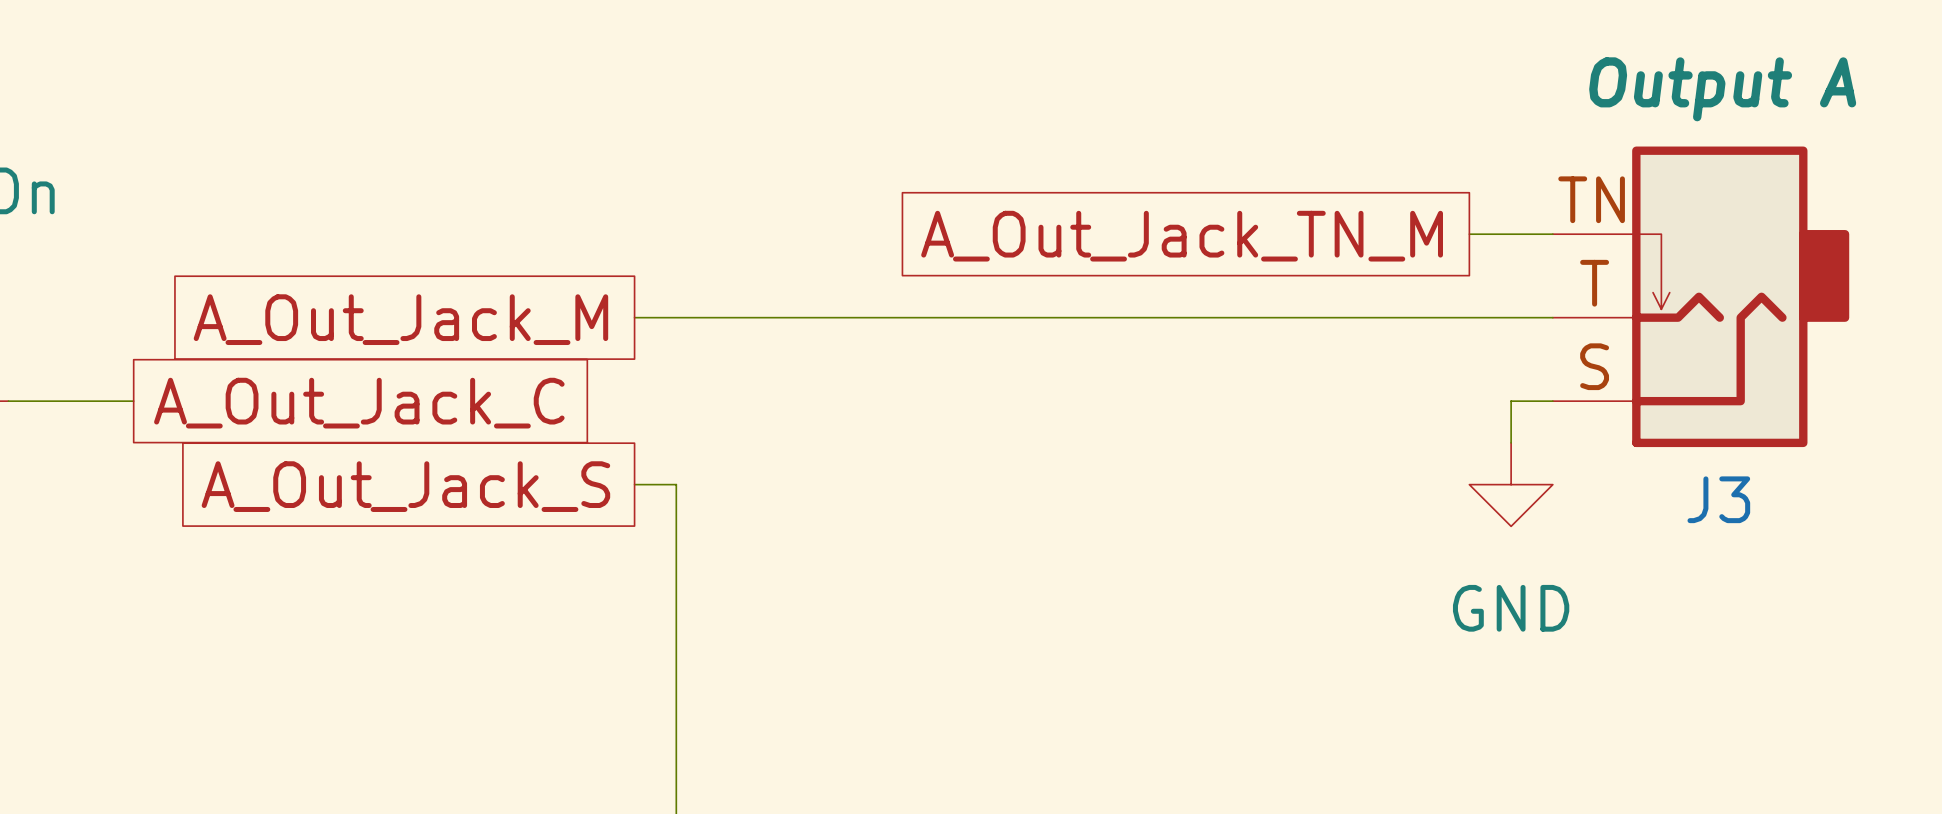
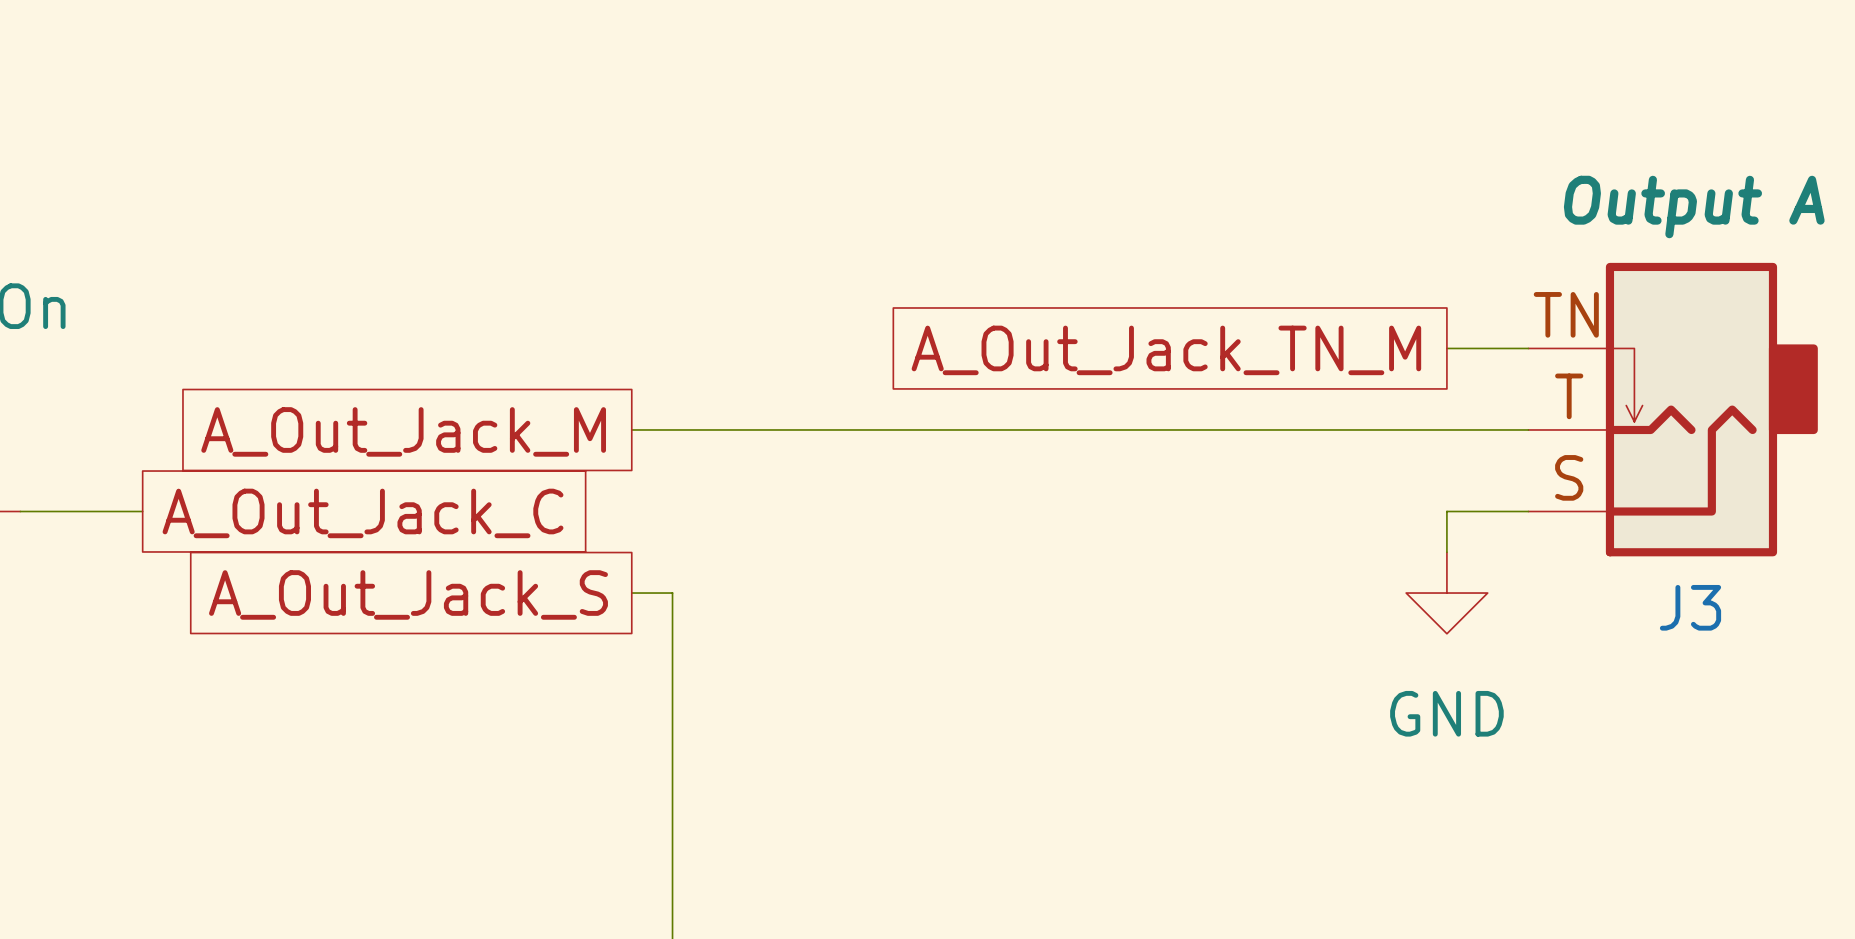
wire: (1511, 401) (1511, 442) -> (1487, 511) (1446, 511) (1446, 552)
power symbol position: GND (1511, 484) -> GND (1446, 593)

